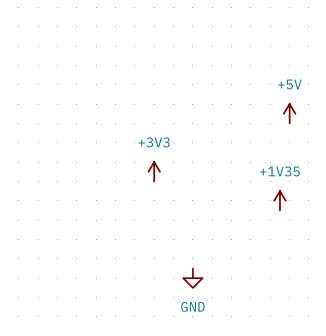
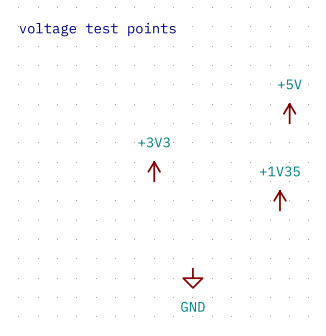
text: none -> voltage test points (97, 29)

